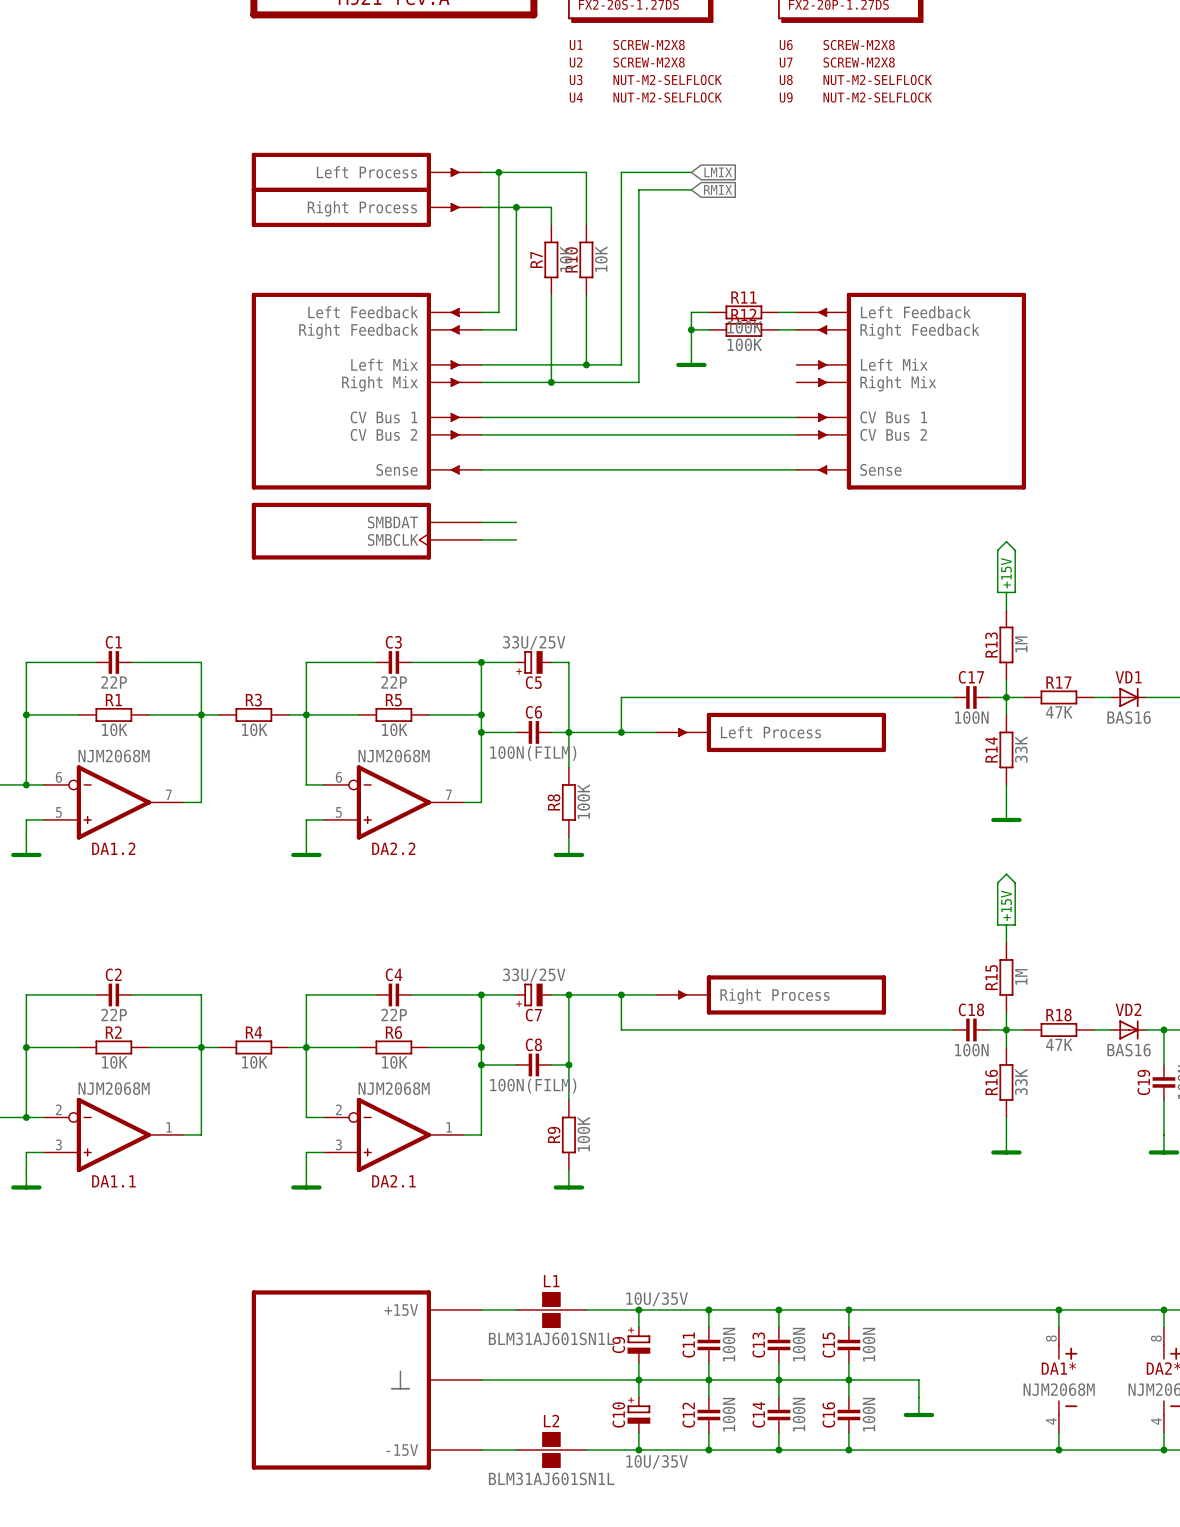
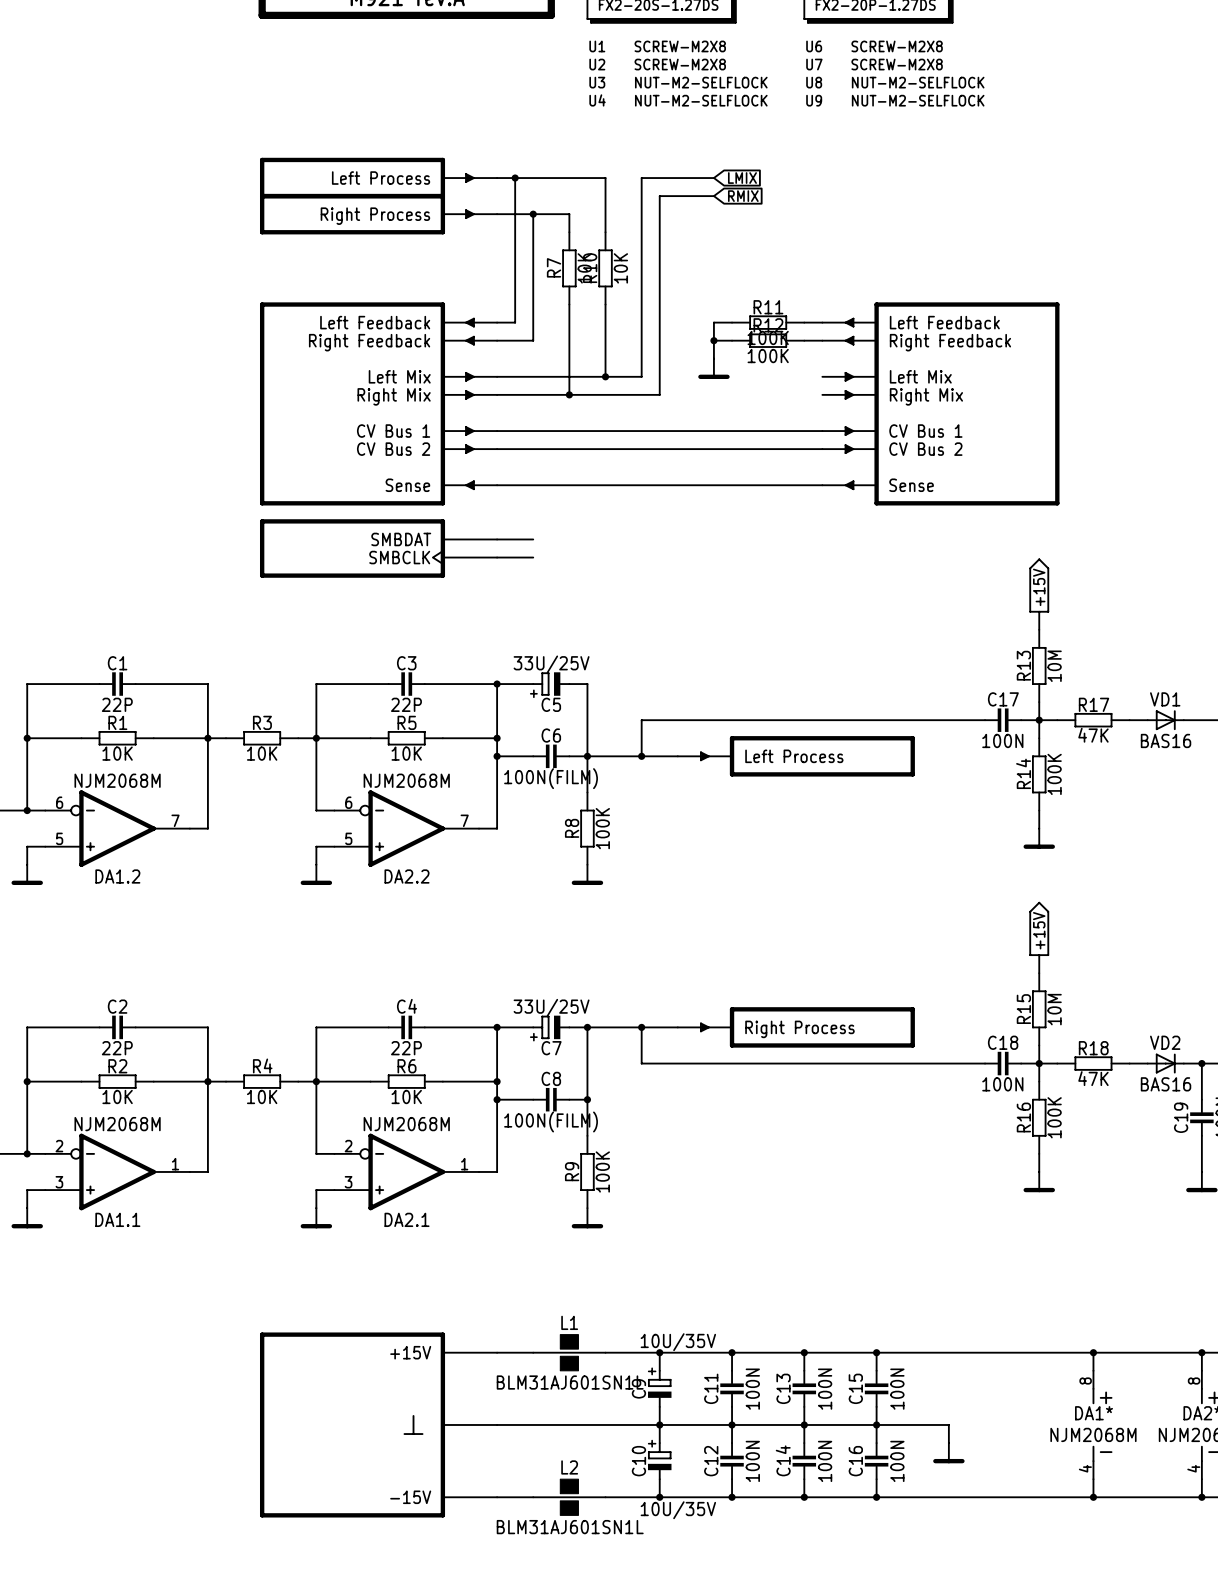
R13 value: 1M (1021, 644) -> 10M (1054, 666)
R14 value: 33K (1021, 749) -> 100K (1054, 774)
R15 value: 1M (1021, 976) -> 10M (1054, 1009)
R16 value: 33K (1021, 1082) -> 100K (1054, 1117)

